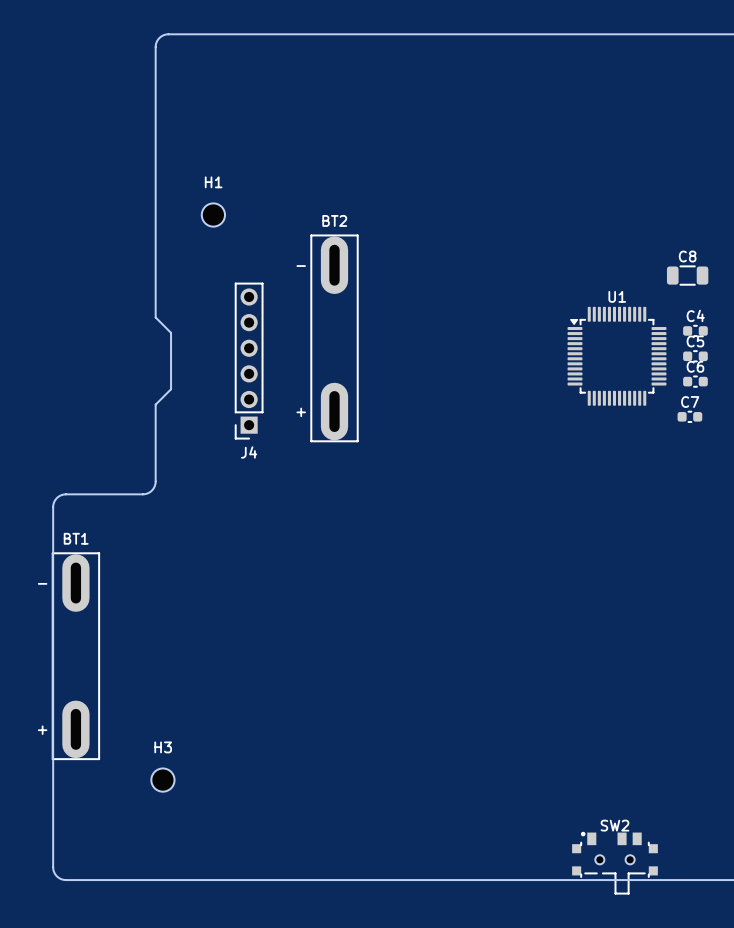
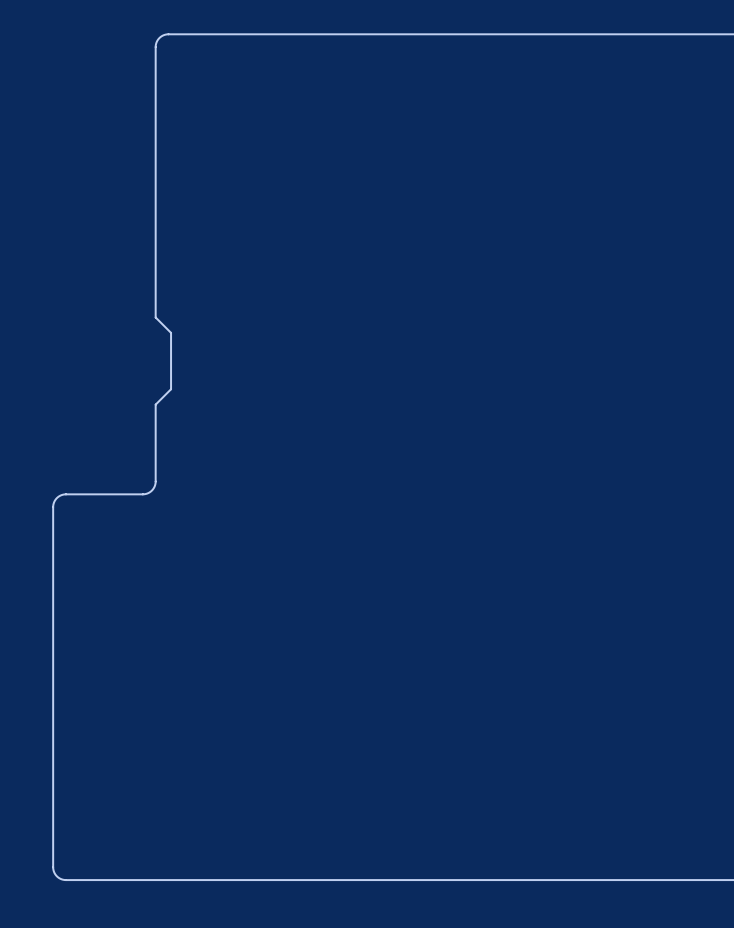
H1: (213, 215) -> none
C8: (687, 275) -> none
C4: (695, 330) -> none
BT2: (334, 338) -> none
U1: (617, 356) -> none
C5: (695, 356) -> none
J4: (249, 361) -> none
C6: (695, 381) -> none
C7: (689, 416) -> none
BT1: (75, 656) -> none
H3: (162, 780) -> none
SW2: (614, 862) -> none

